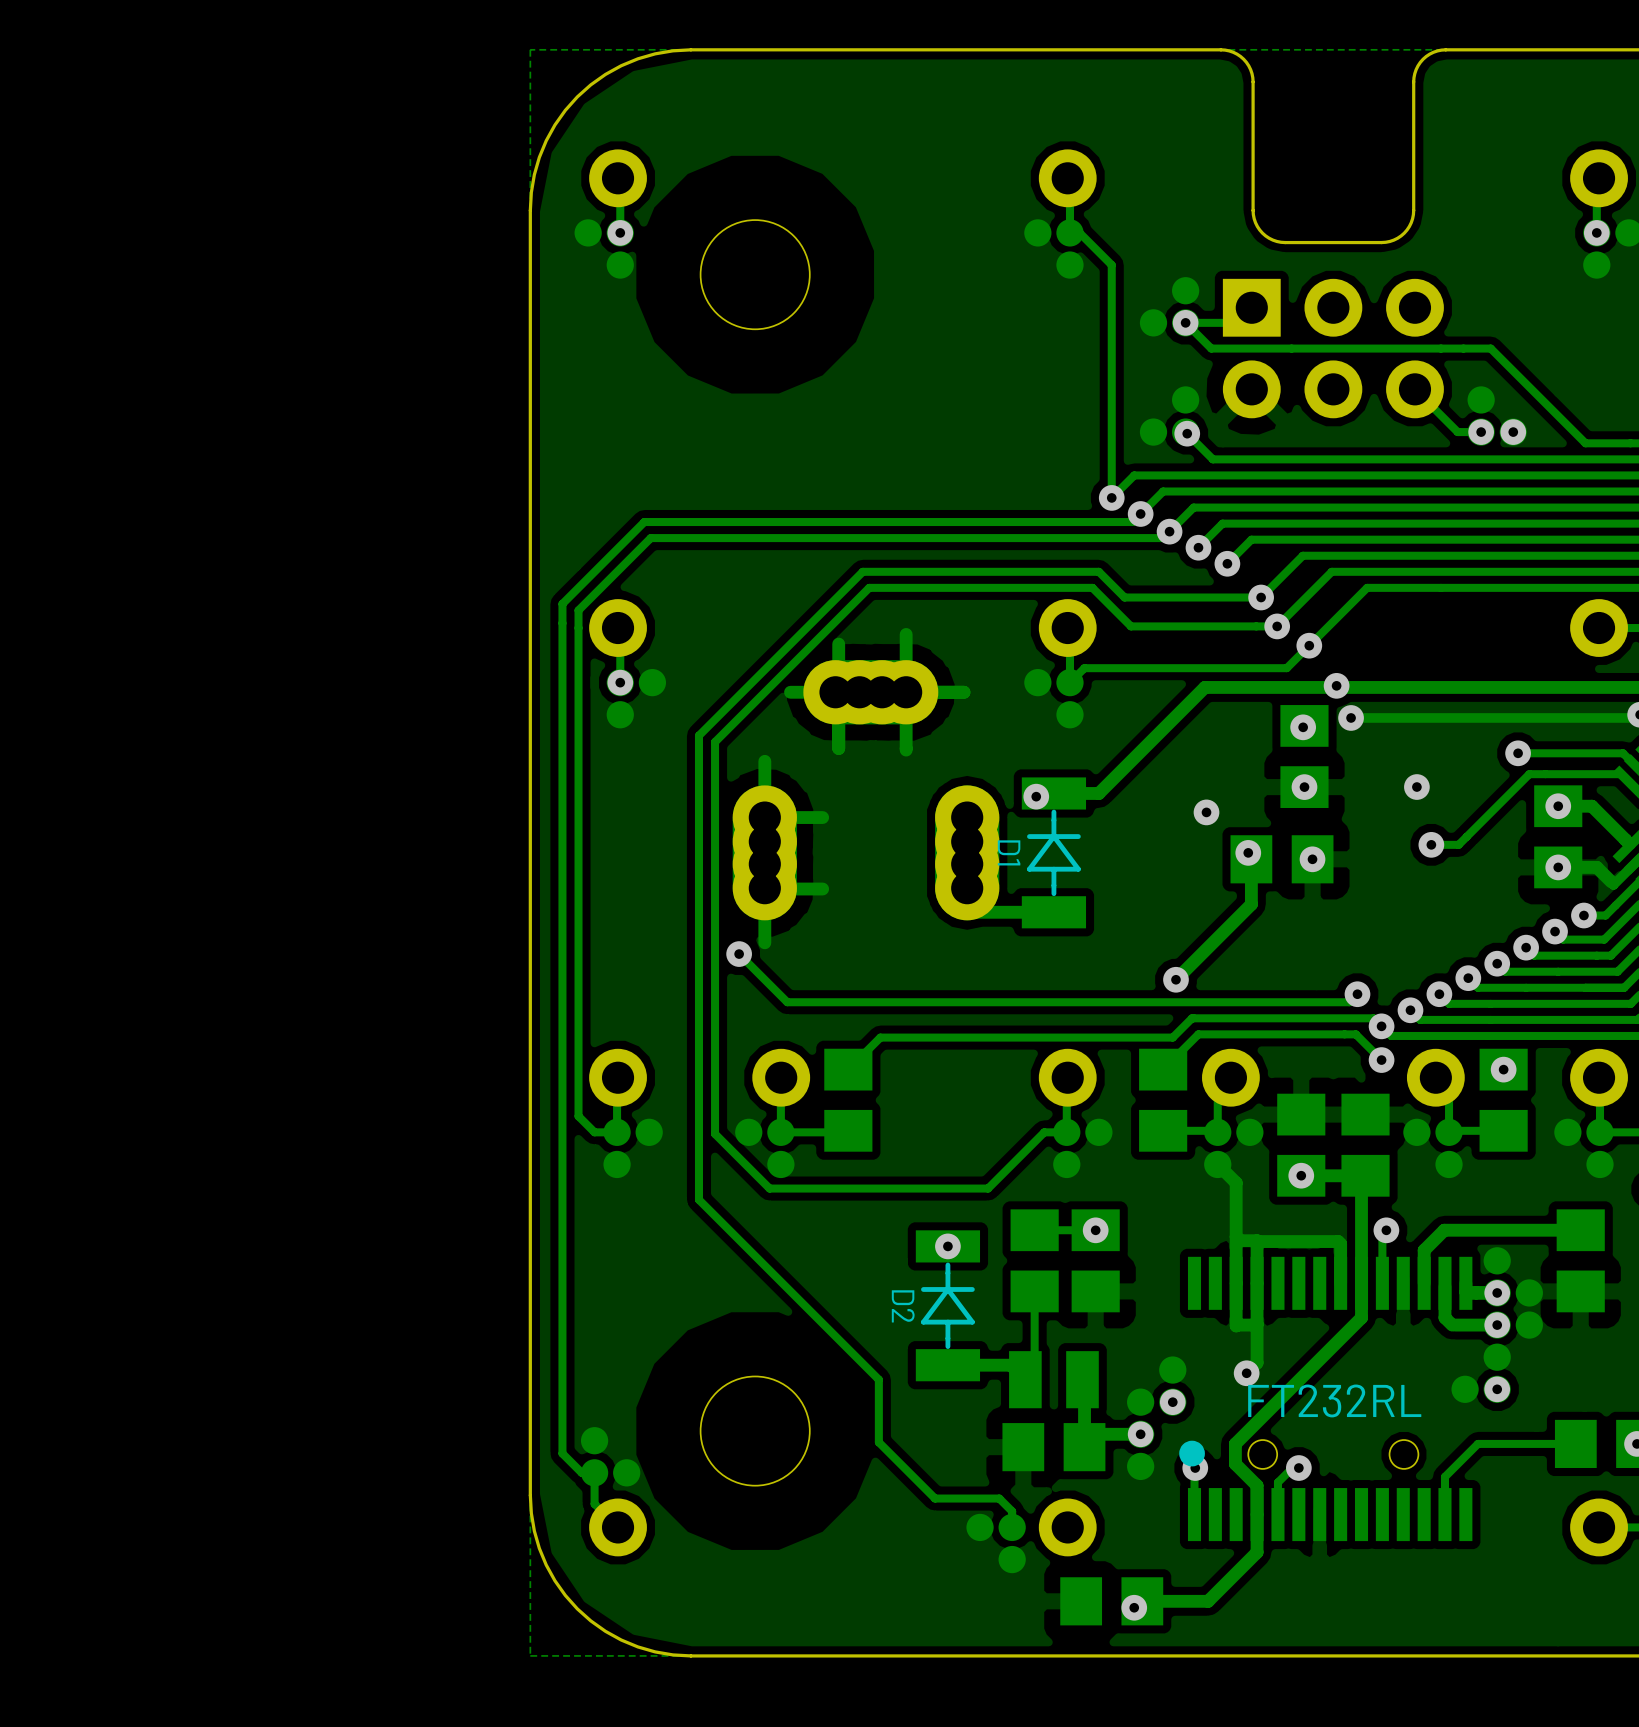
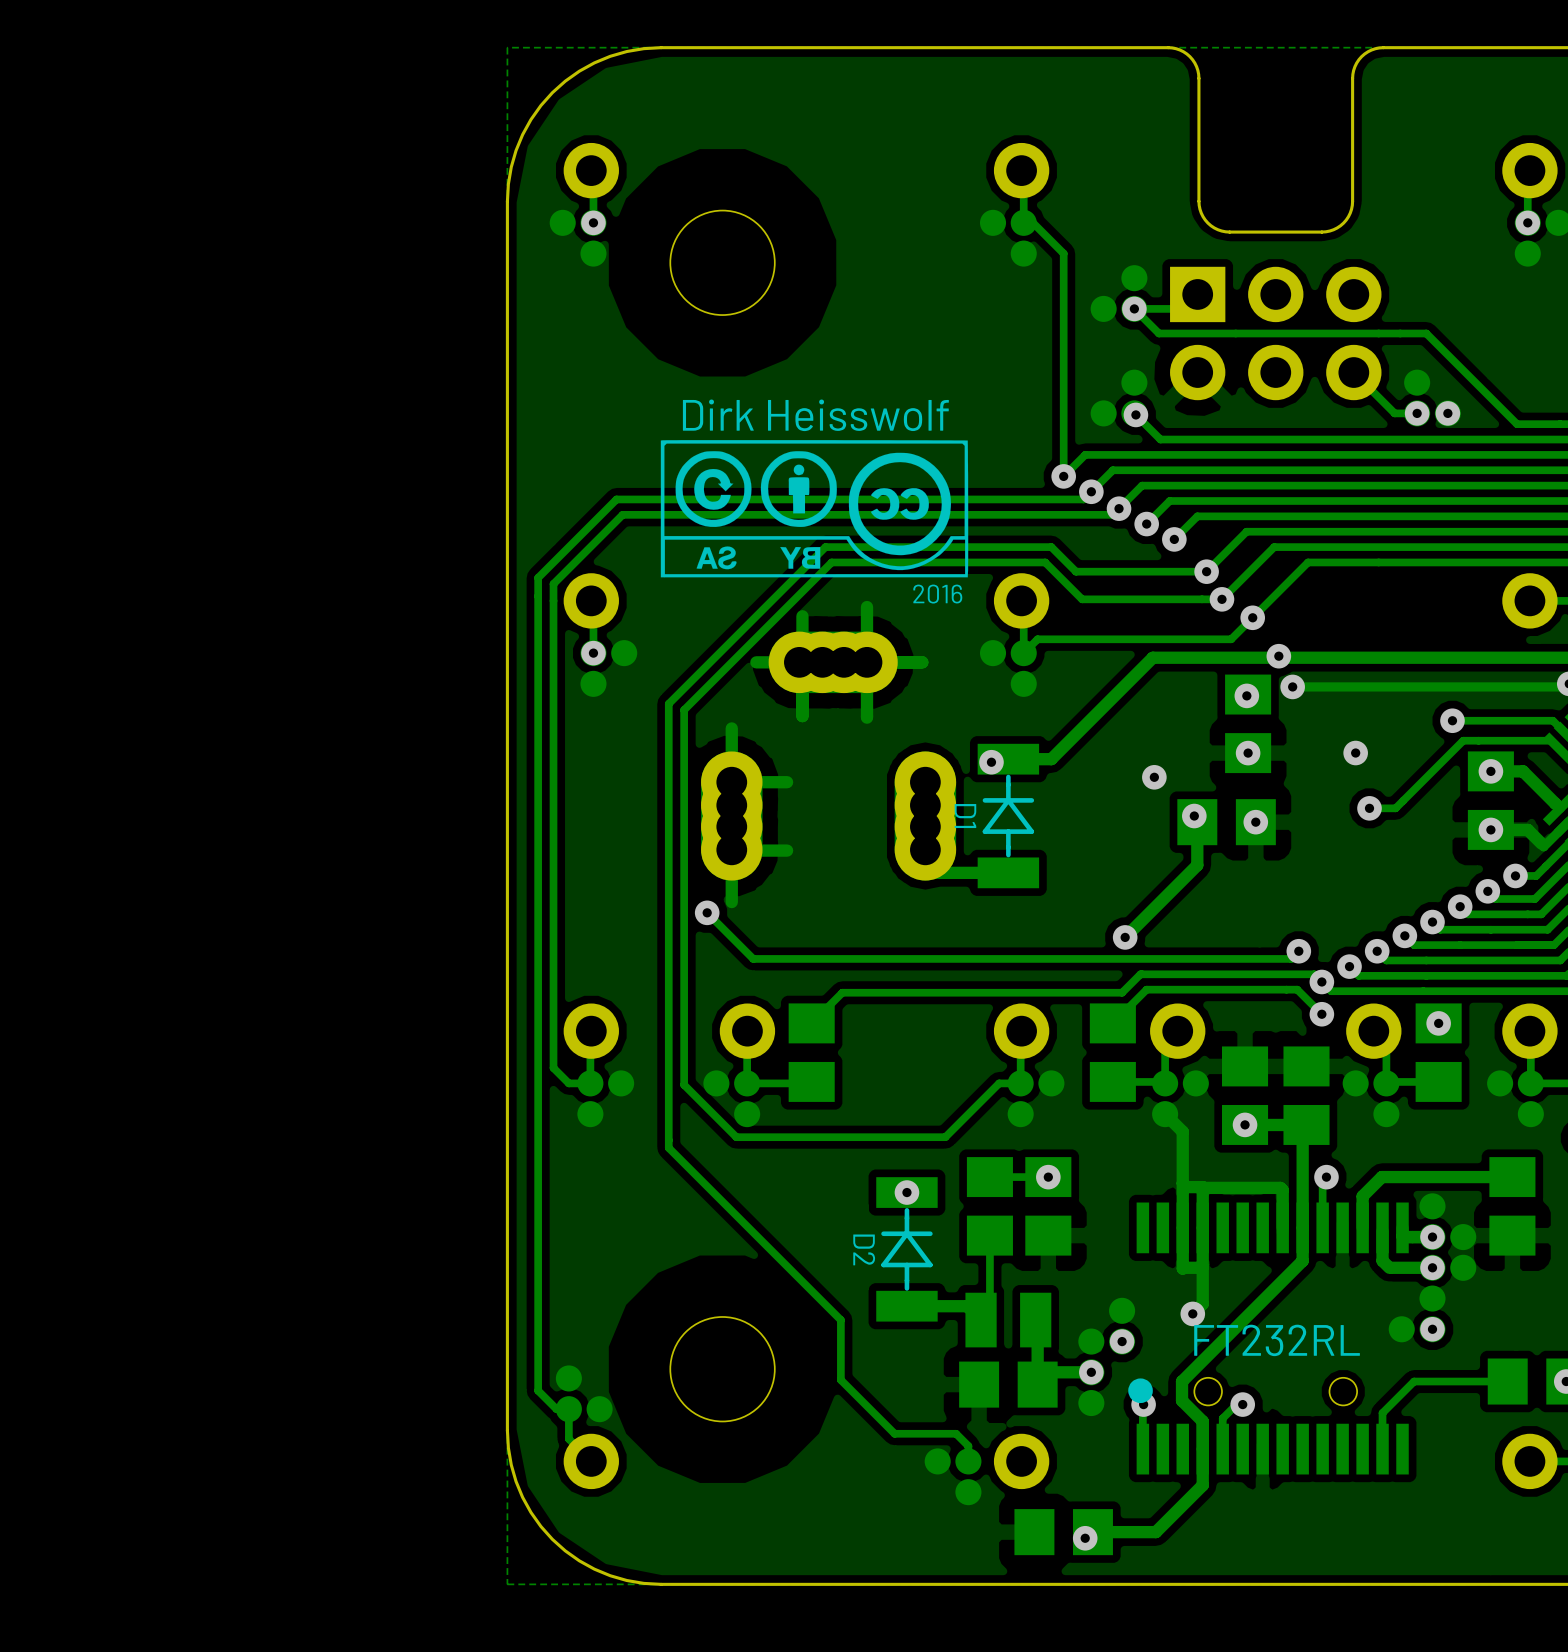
text: none -> Dirk Heisswolf (815, 415)
drawing: none -> [660, 440, 969, 578]
text: none -> 2016 (937, 594)

